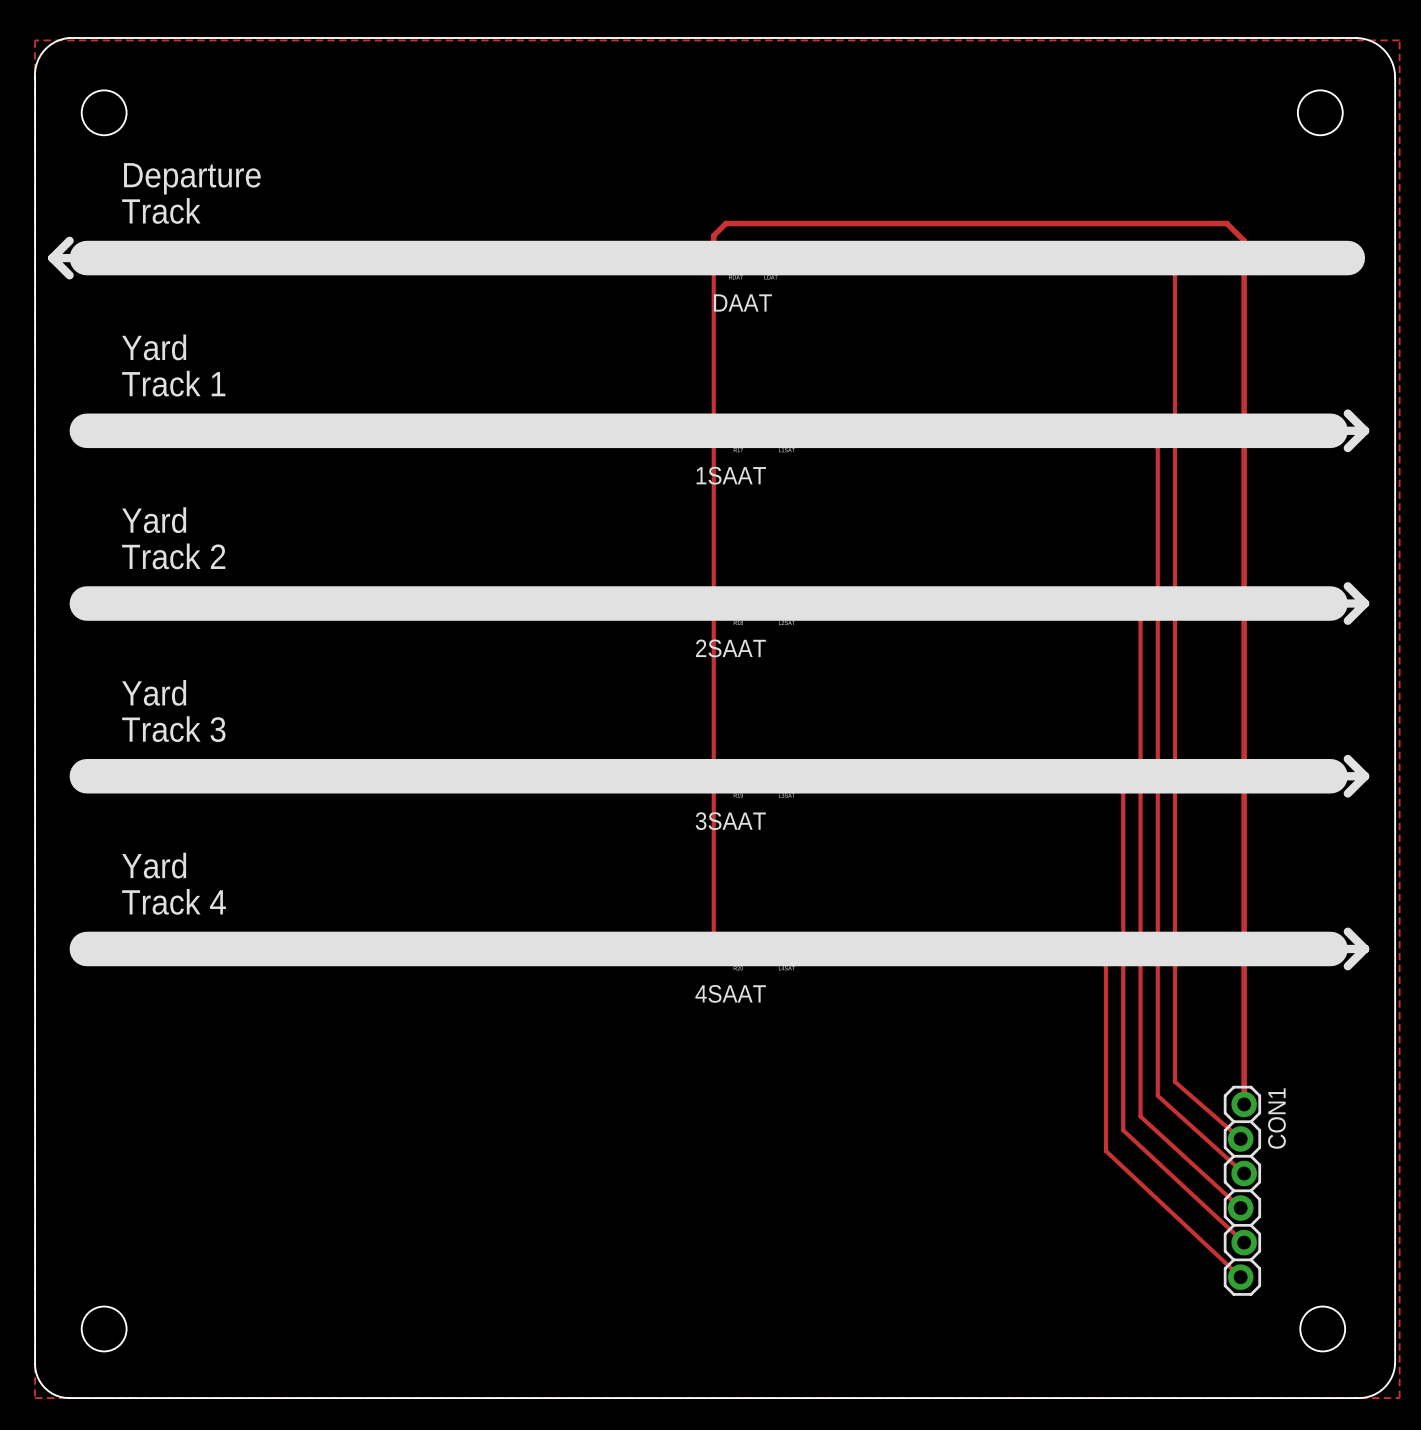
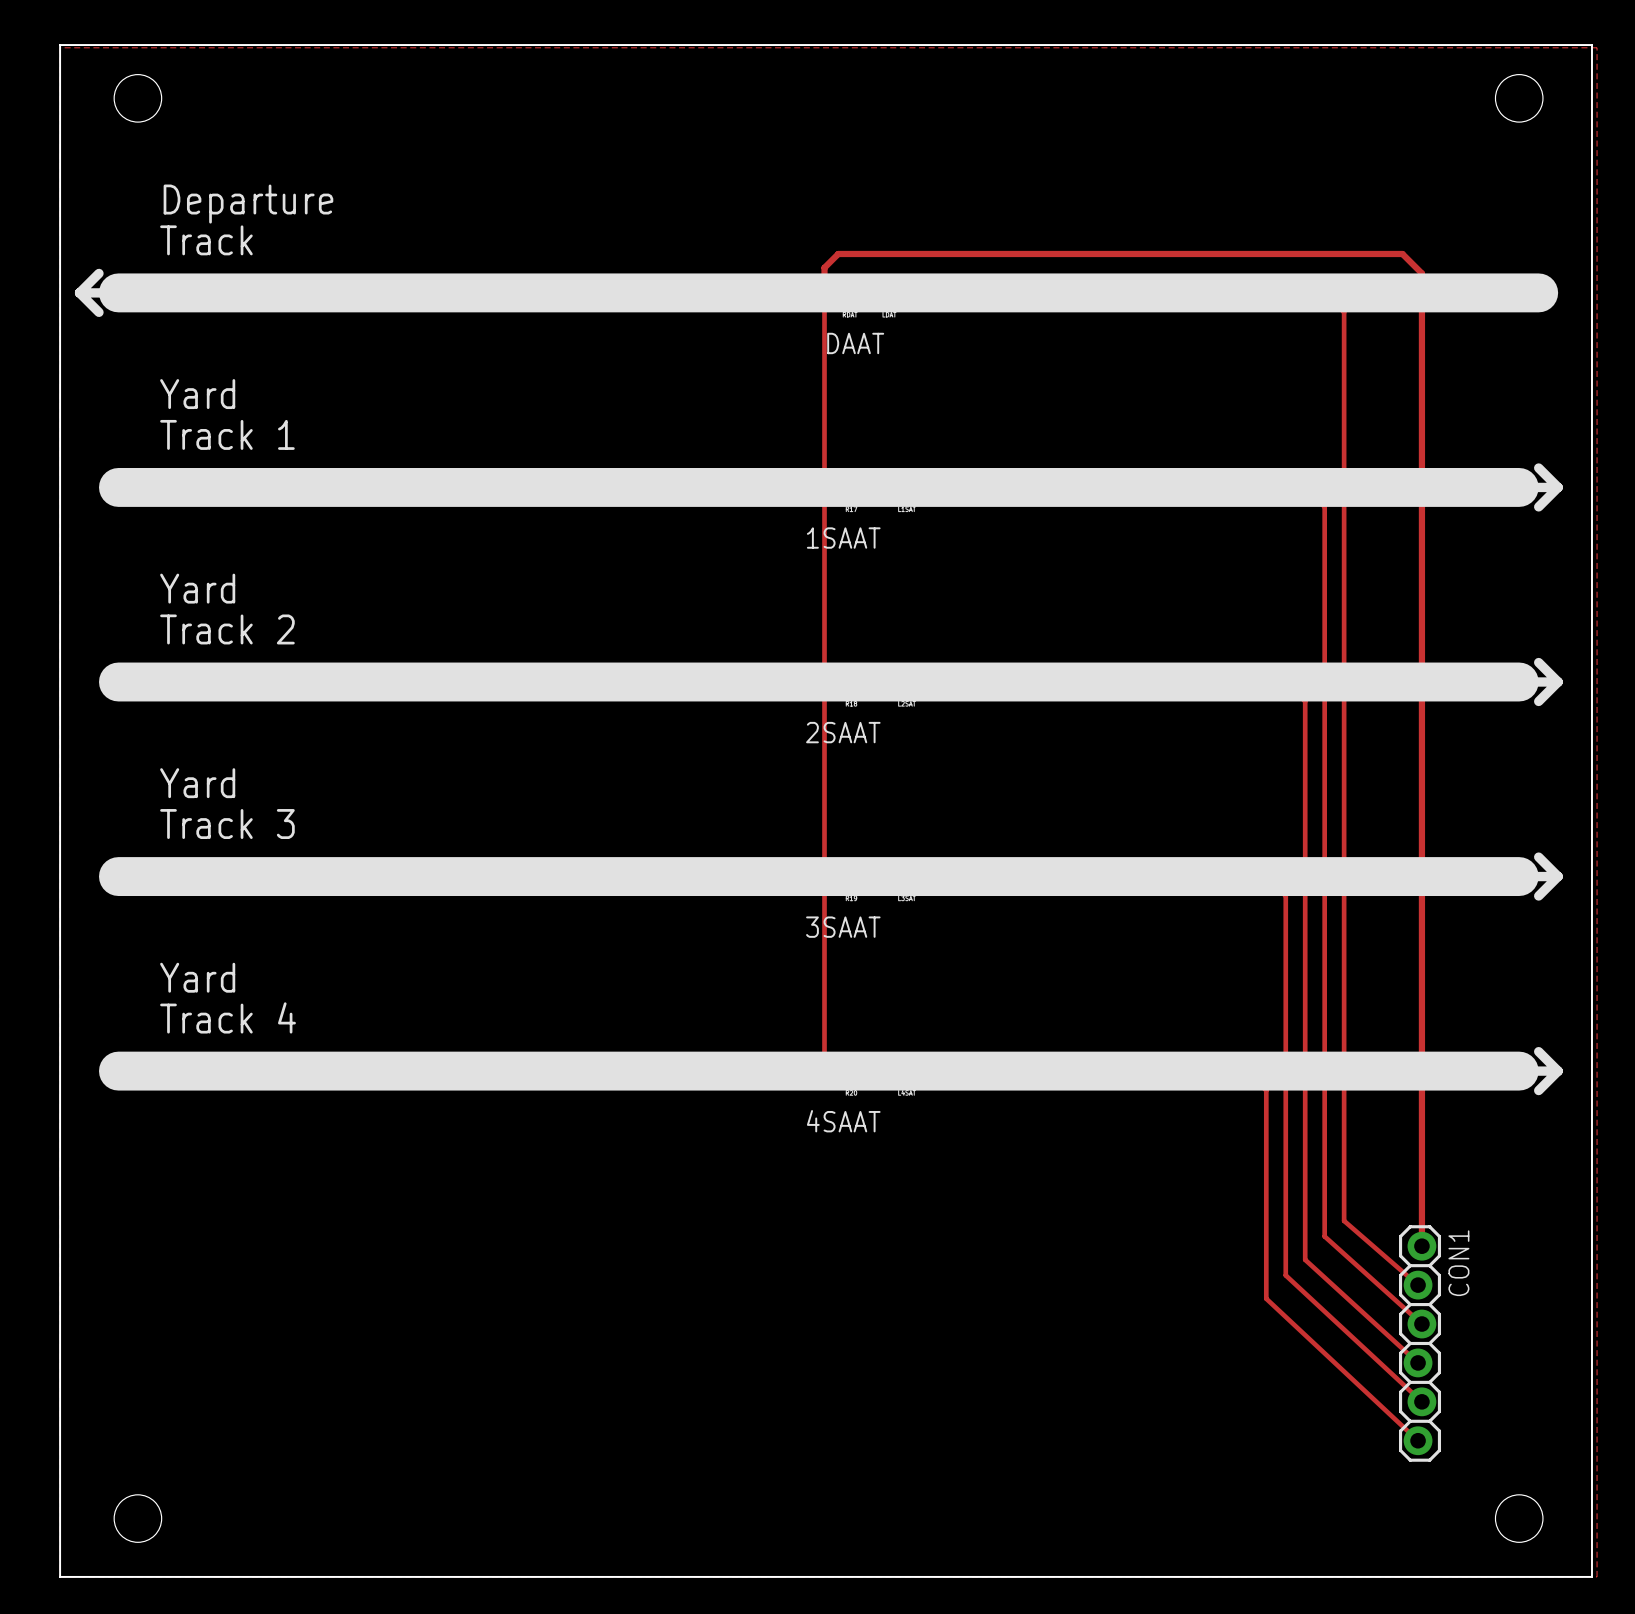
part footprint: [34, 38, 1396, 1399] -> [59, 44, 1593, 1578]

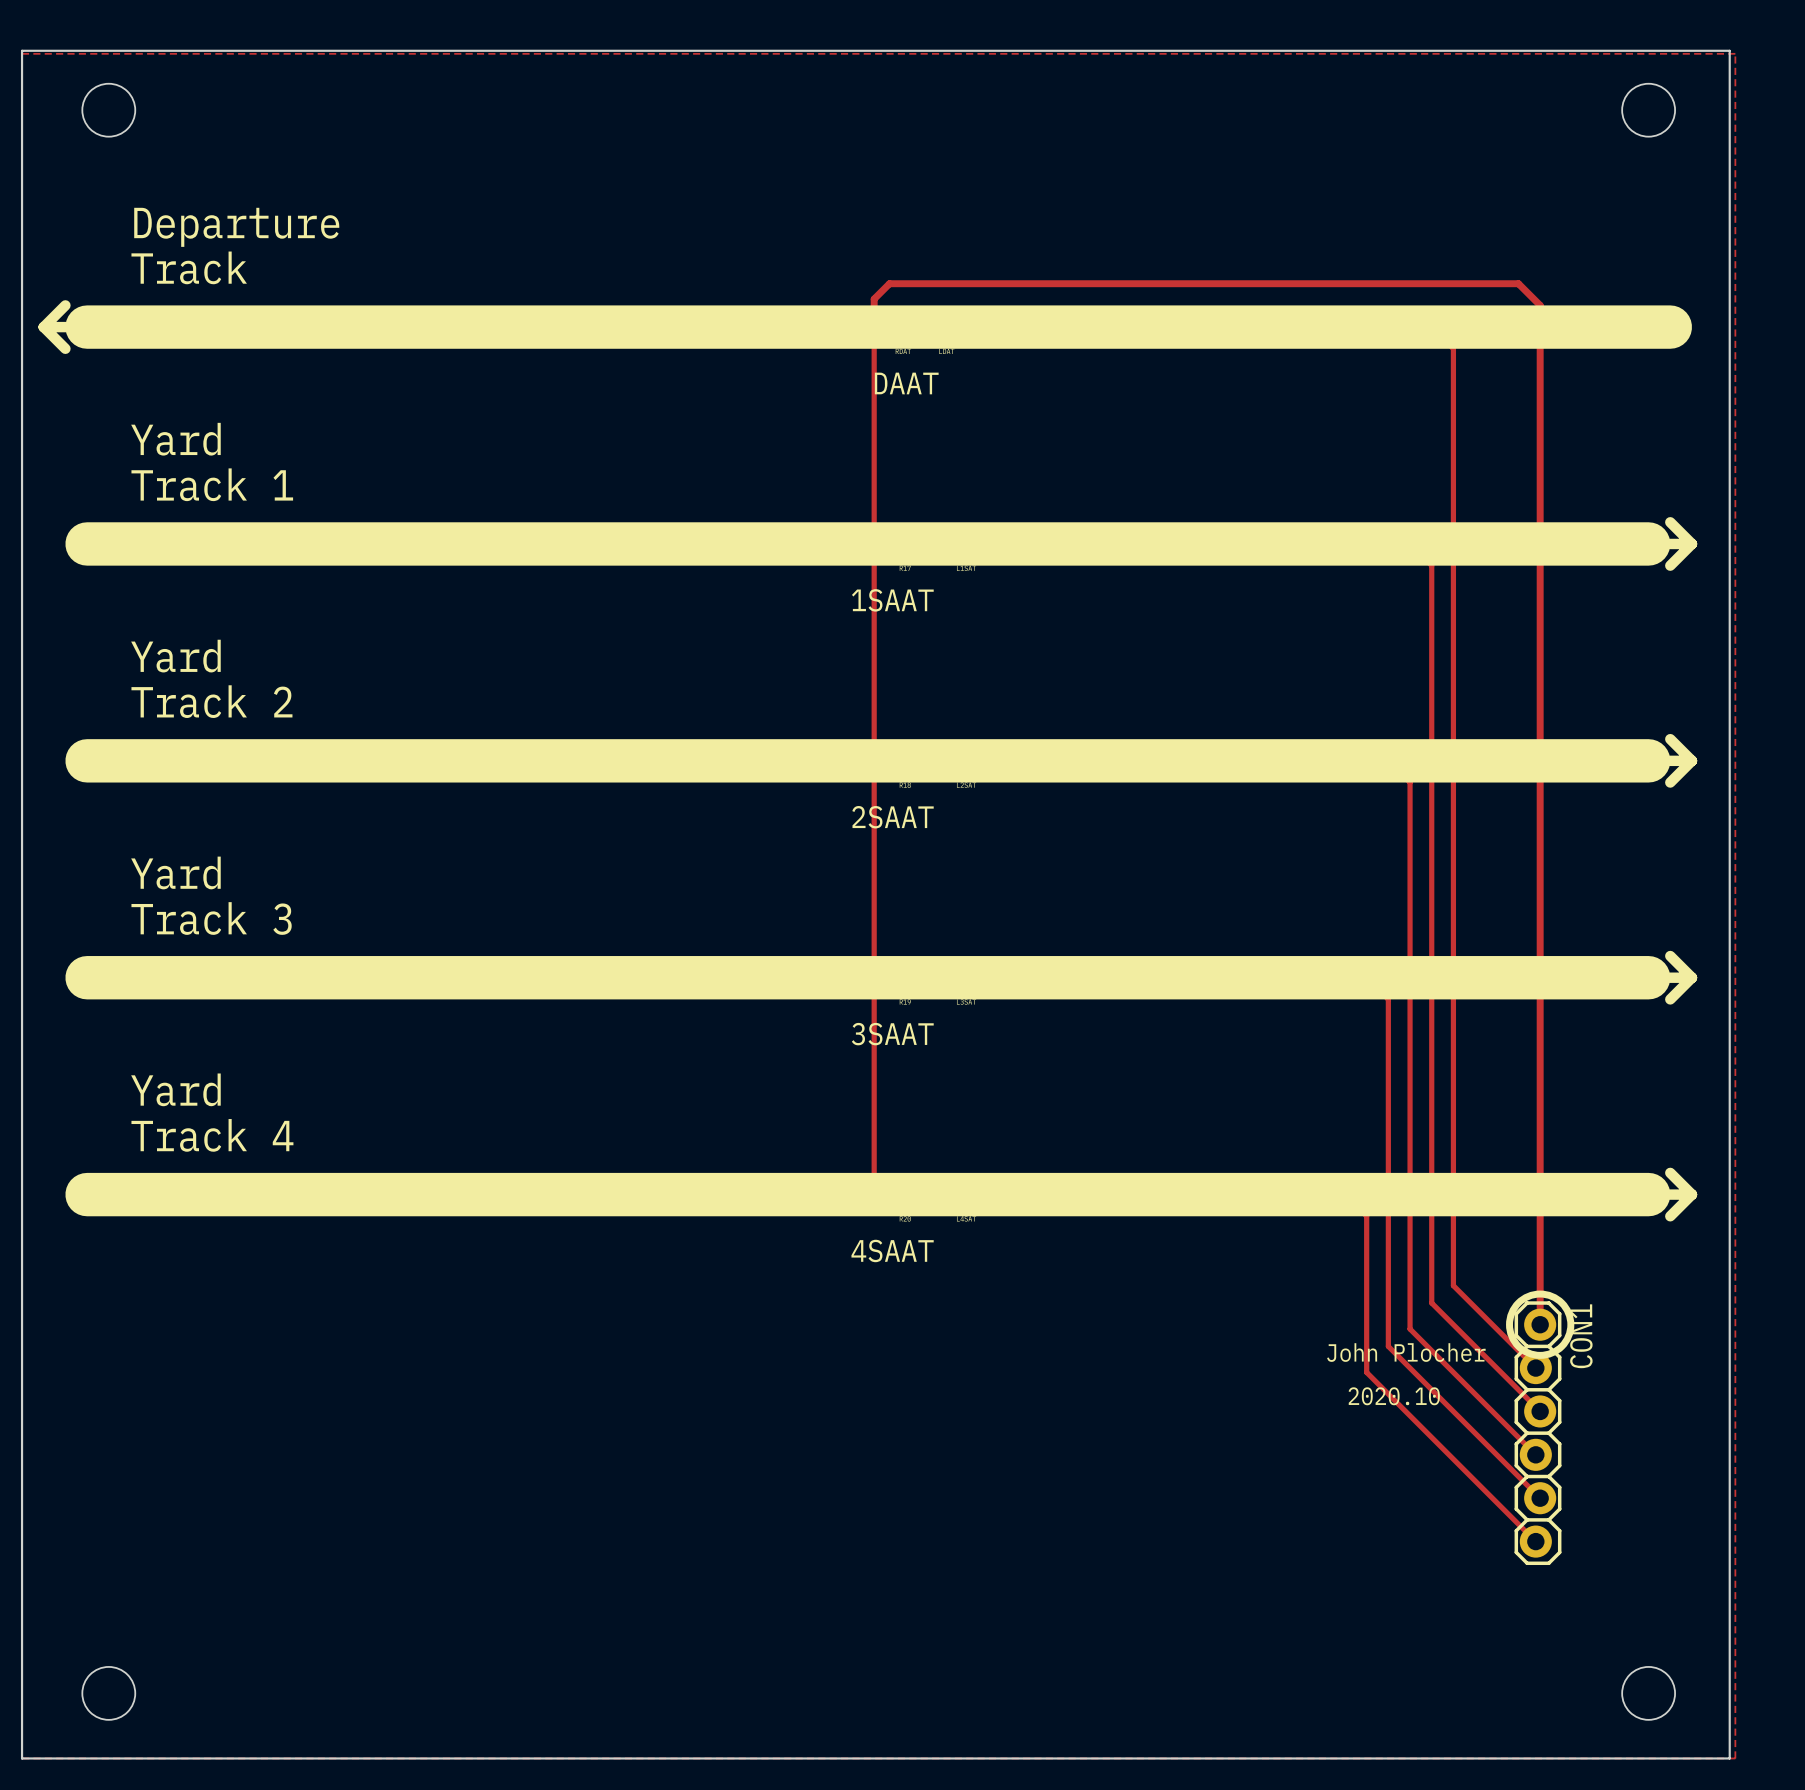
track: (1344, 1152) (1344, 1220) (1418, 1285) -> (1453, 1285) (1535, 1368)
drawing: none -> [1506, 1290, 1575, 1359]
track: (1324, 1168) (1324, 1236) (1421, 1324) -> (1431, 1303) (1540, 1411)
track: (1421, 1187) (1421, 1246) -> none
track: (1305, 1191) (1305, 1259) (1418, 1362) -> (1410, 1329) (1535, 1454)
track: (1285, 1207) (1285, 1275) (1421, 1401) -> (1388, 1346) (1540, 1498)
text: none -> John Plocher (1406, 1352)
track: (1266, 1230) (1266, 1298) (1418, 1440) -> (1366, 1372) (1535, 1541)
text: none -> 2020.10 (1394, 1396)
CON1 position: (1420, 1343) -> (1538, 1433)

